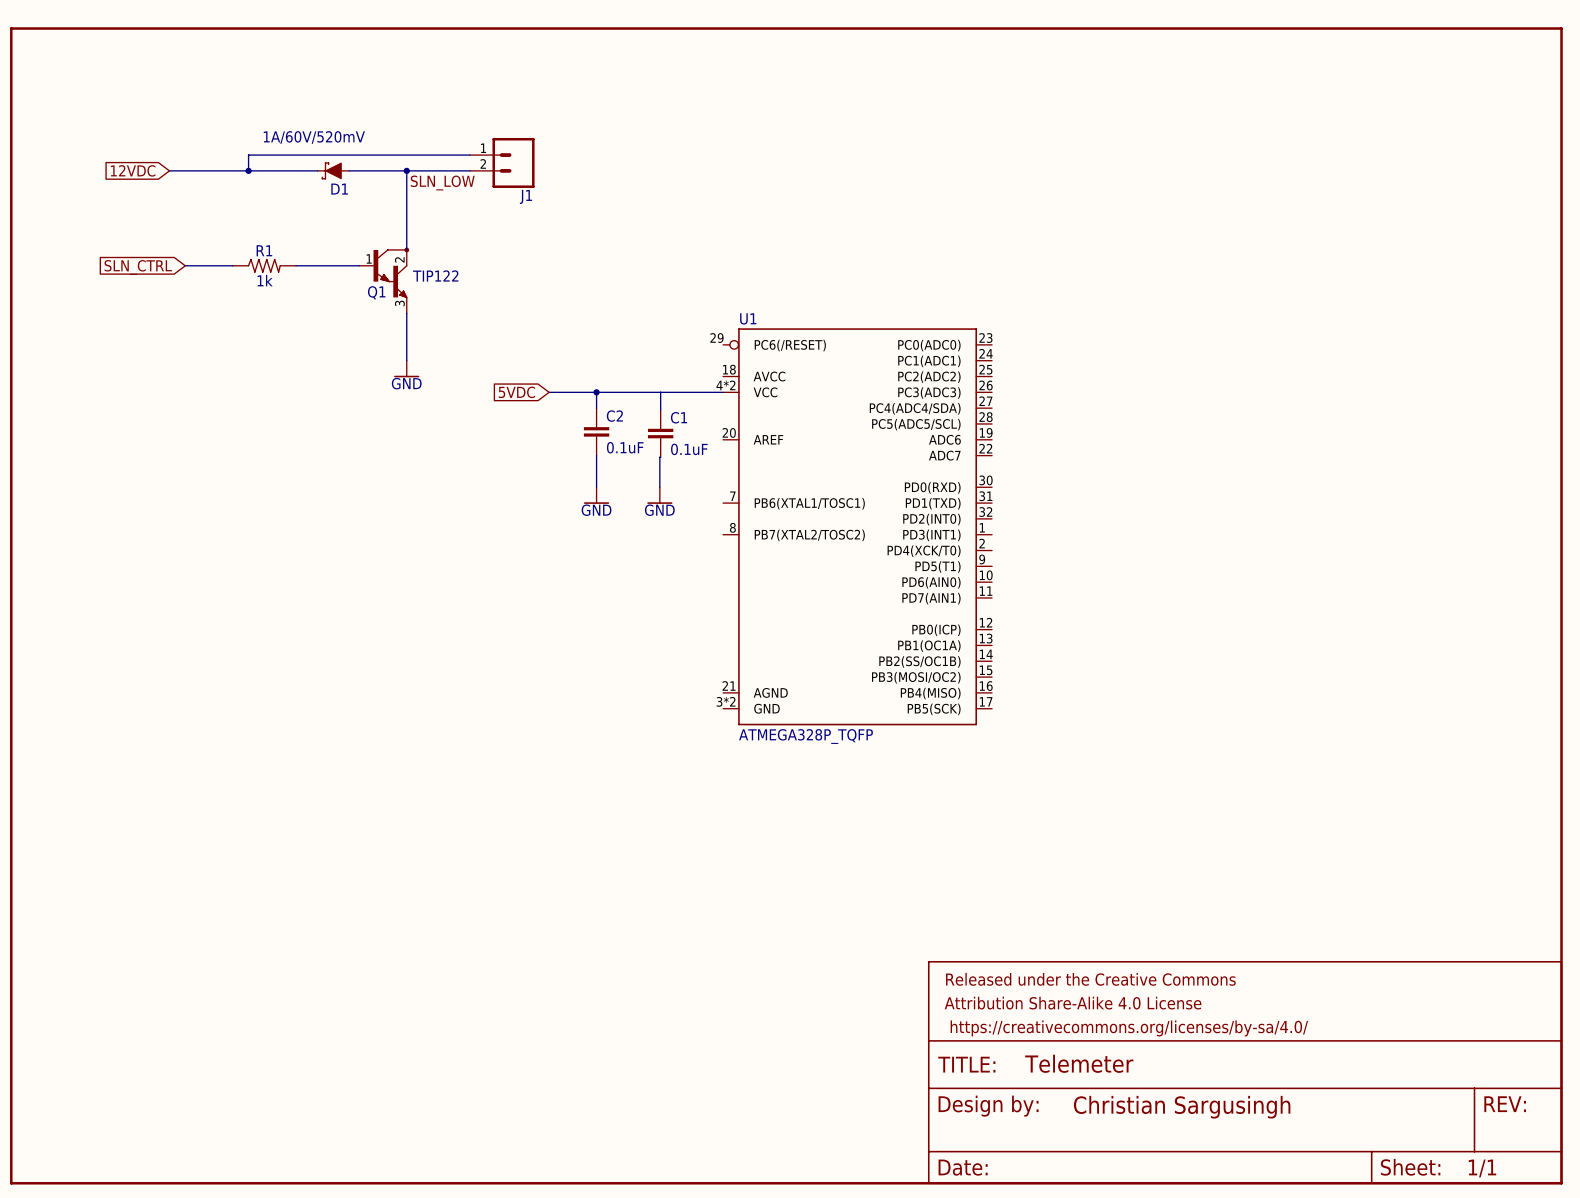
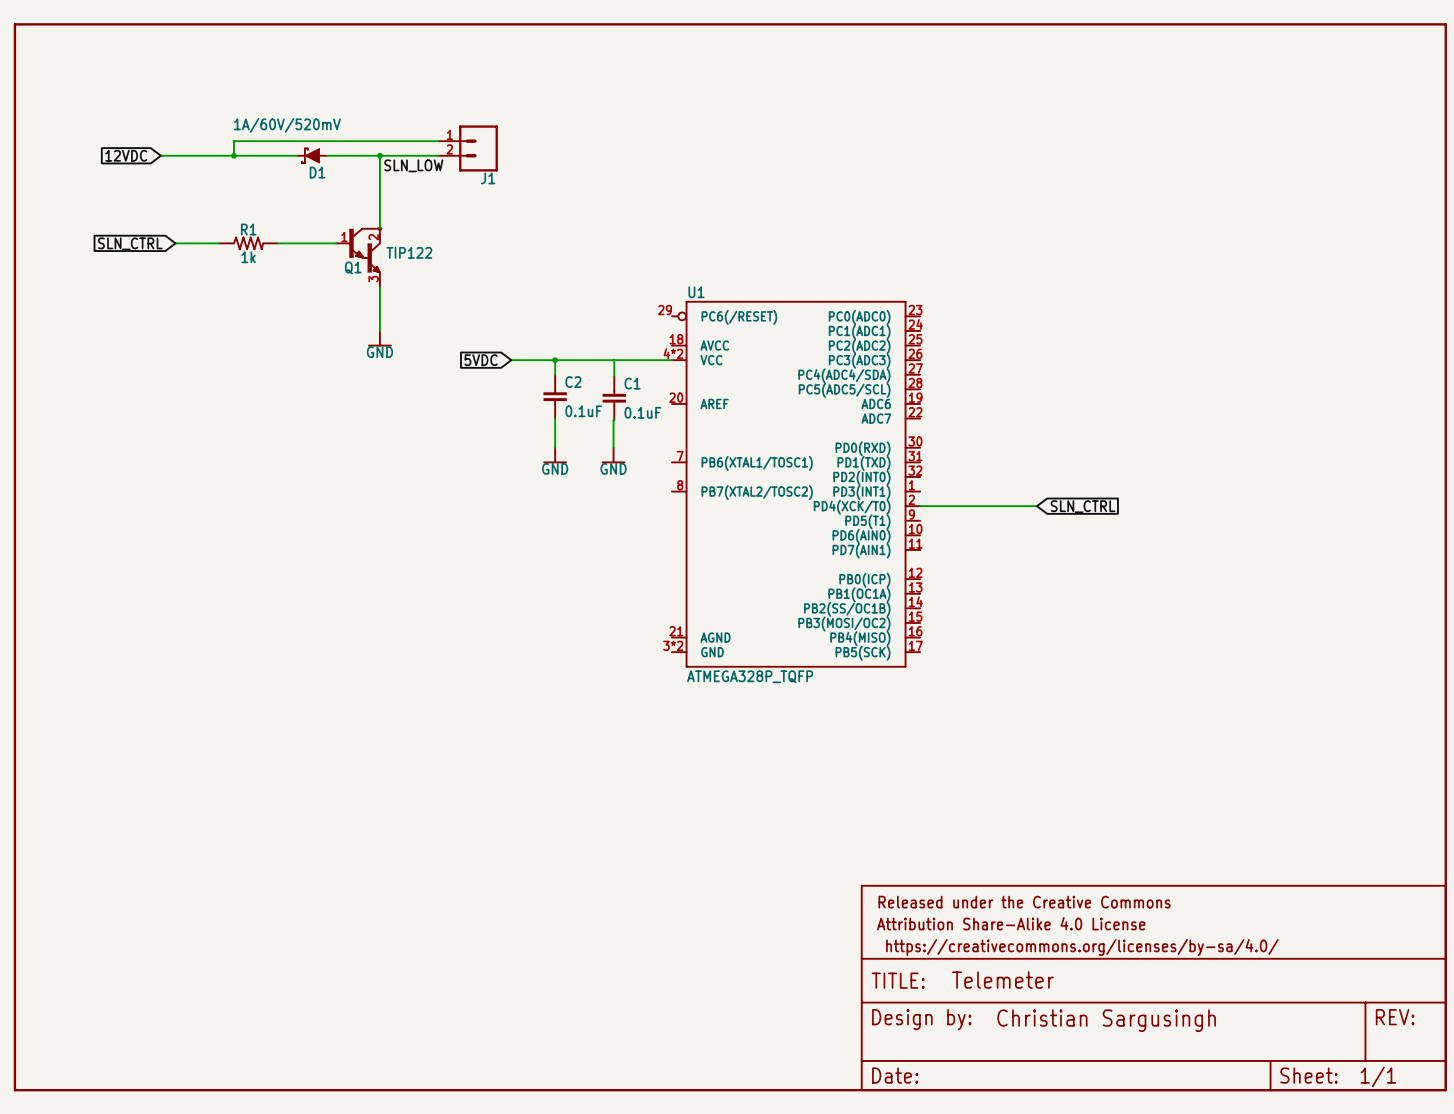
wire: none -> (920, 506) (1036, 506)
global label: none -> SLN_CTRL (1083, 506)

